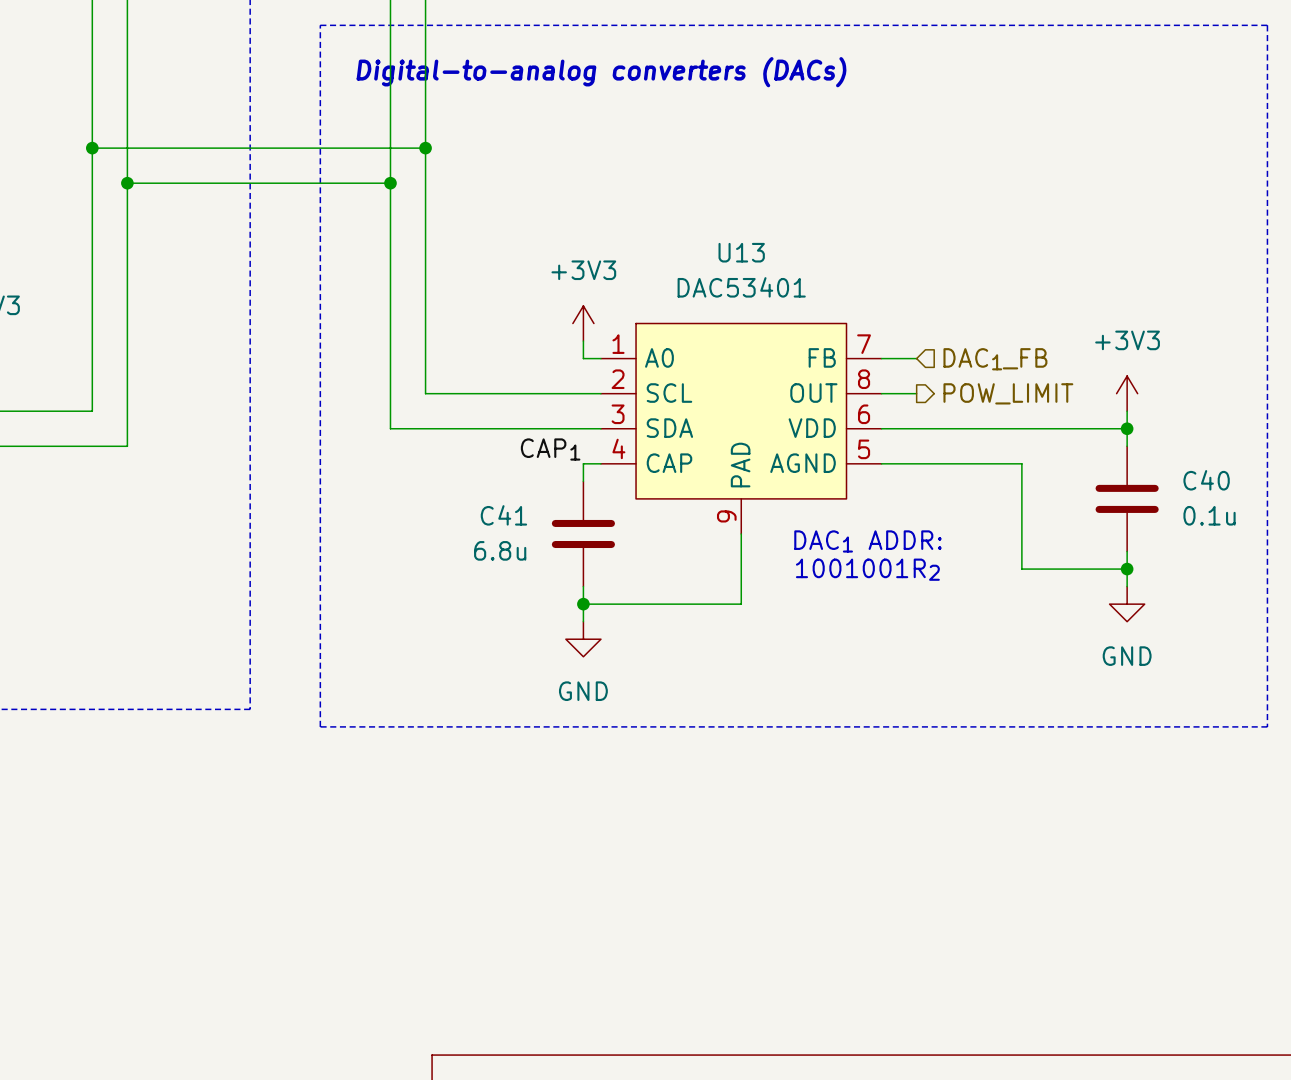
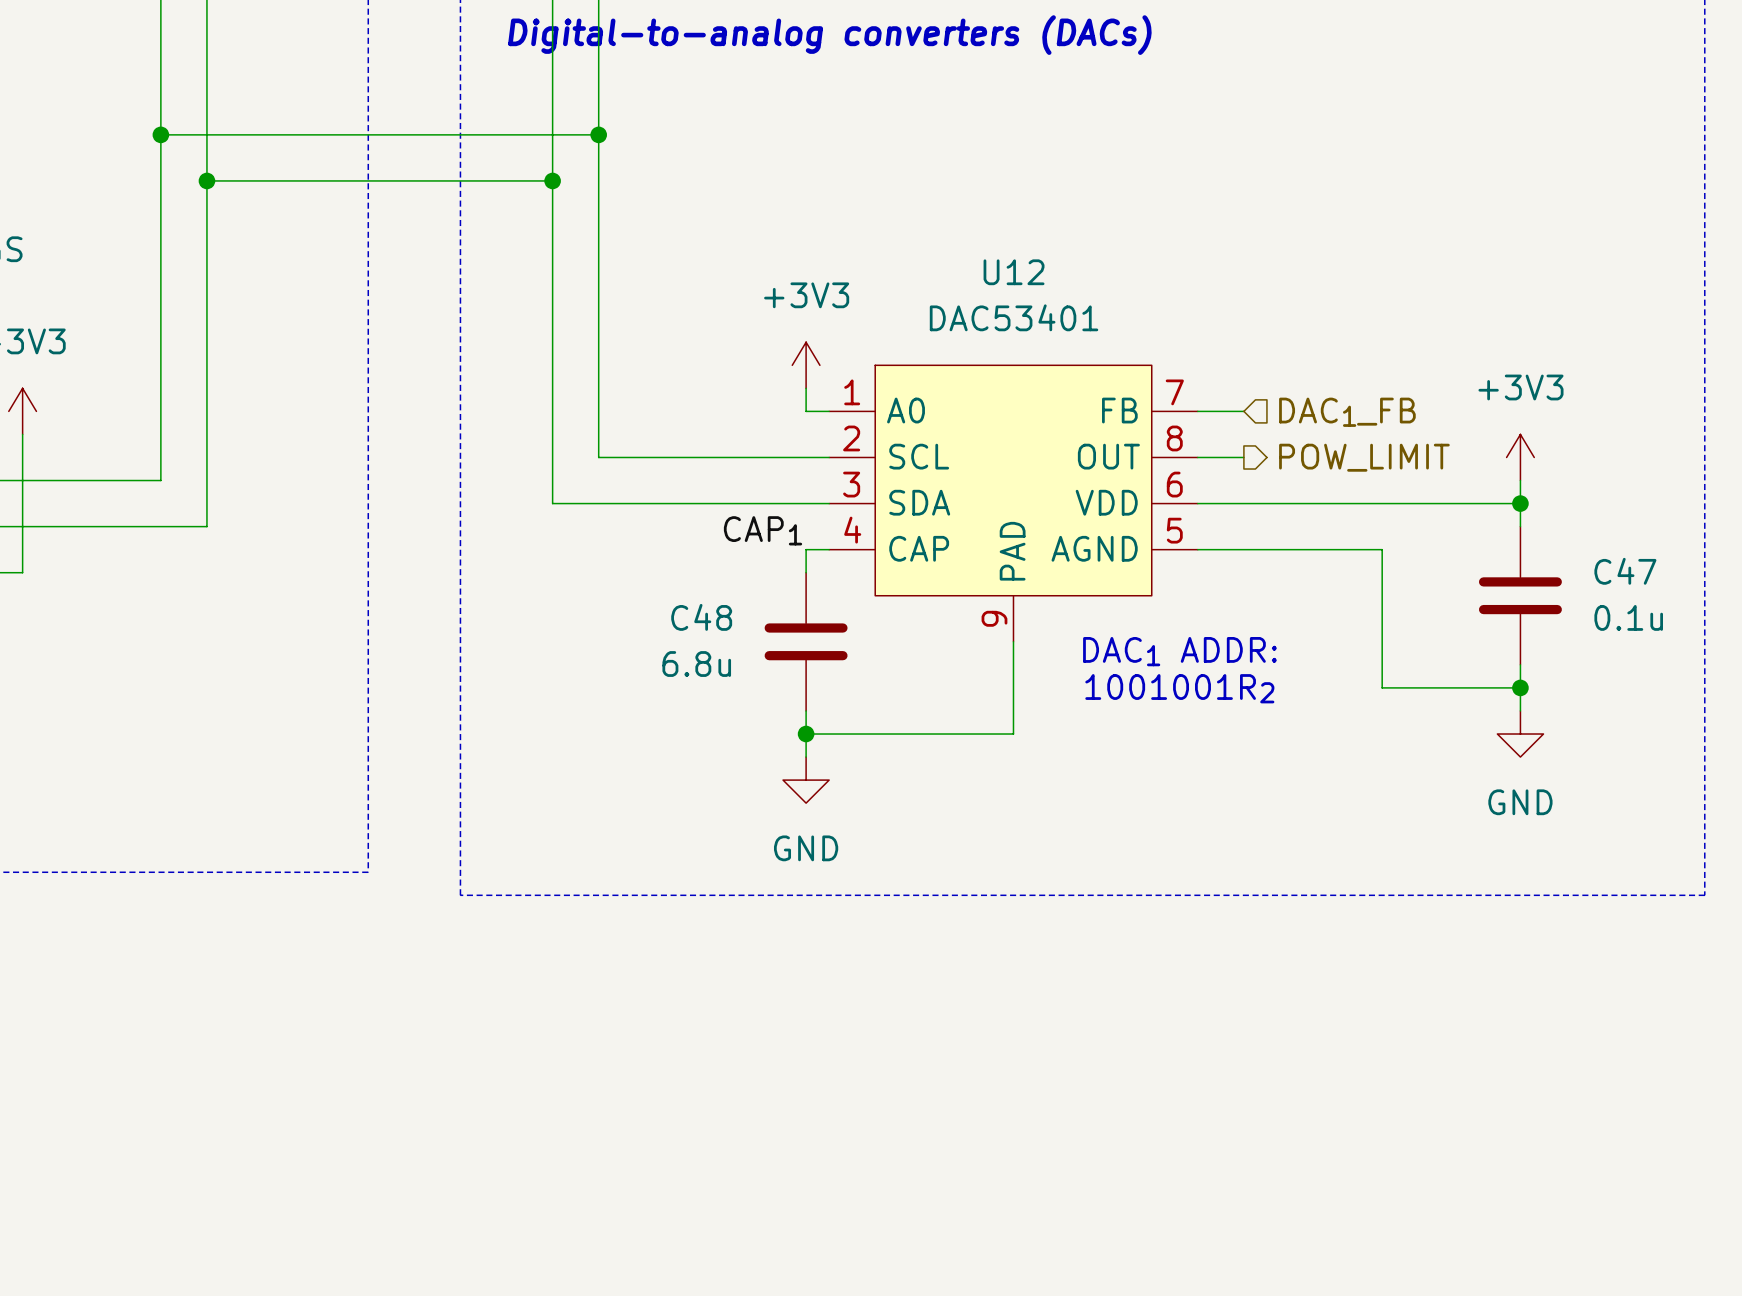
U13 name: U13 (741, 252) -> U12 (1014, 272)
C40 name: C40 (1206, 480) -> C47 (1625, 571)
C41 name: C41 (503, 515) -> C48 (701, 617)

